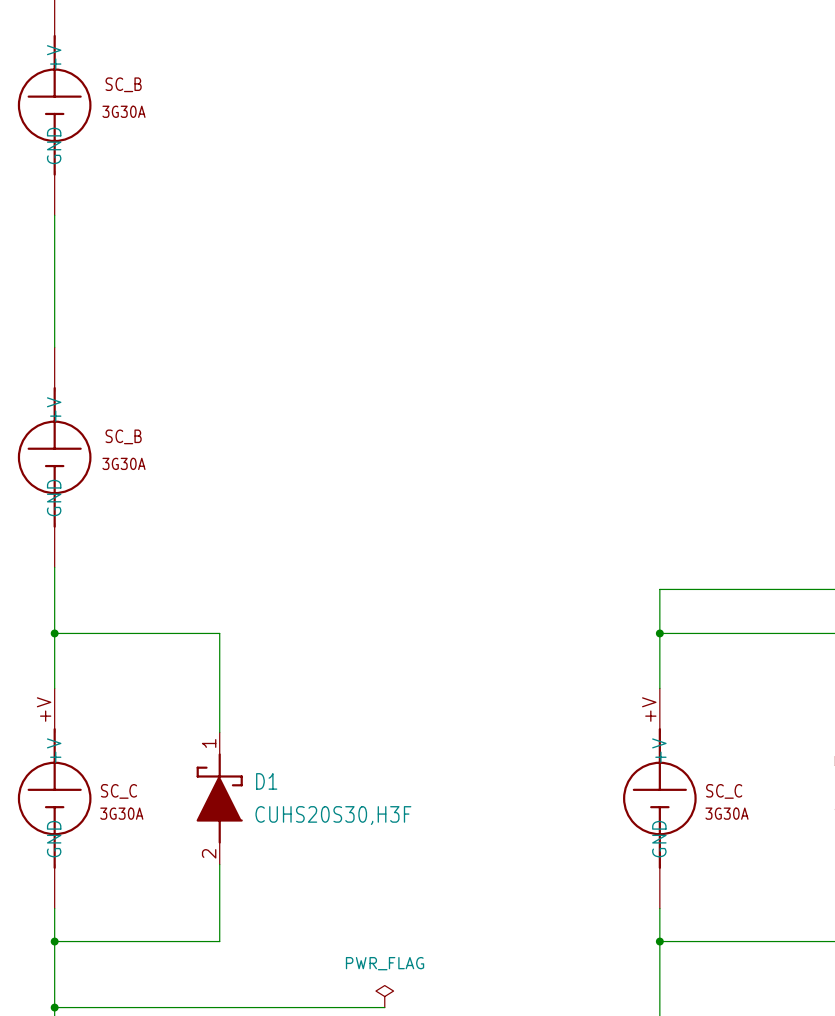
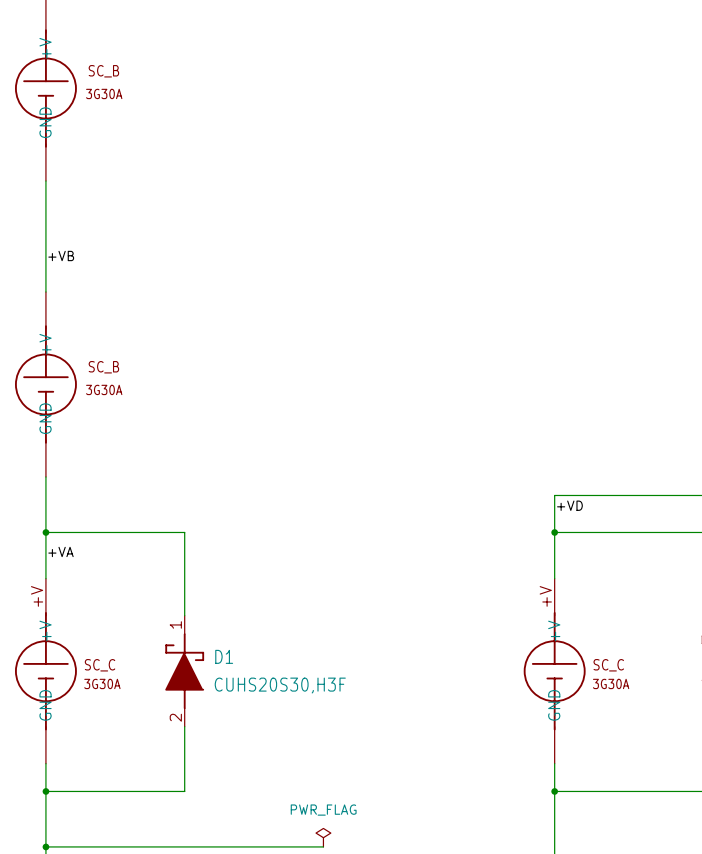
label: none -> +VB (61, 255)
label: none -> +VD (569, 505)
label: none -> +VA (61, 551)

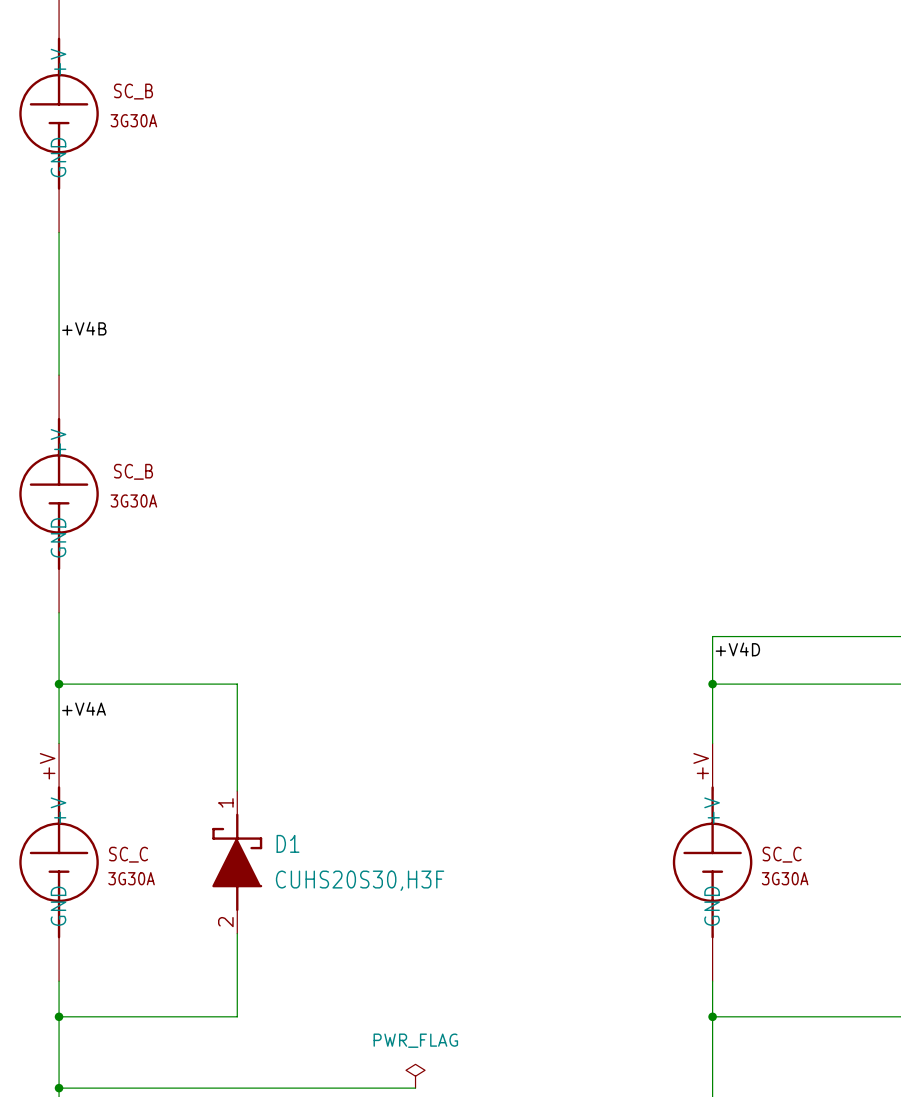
label: +VB (61, 255) -> +V4B (84, 328)
label: +VD (569, 505) -> +V4D (737, 649)
label: +VA (61, 551) -> +V4A (84, 708)

